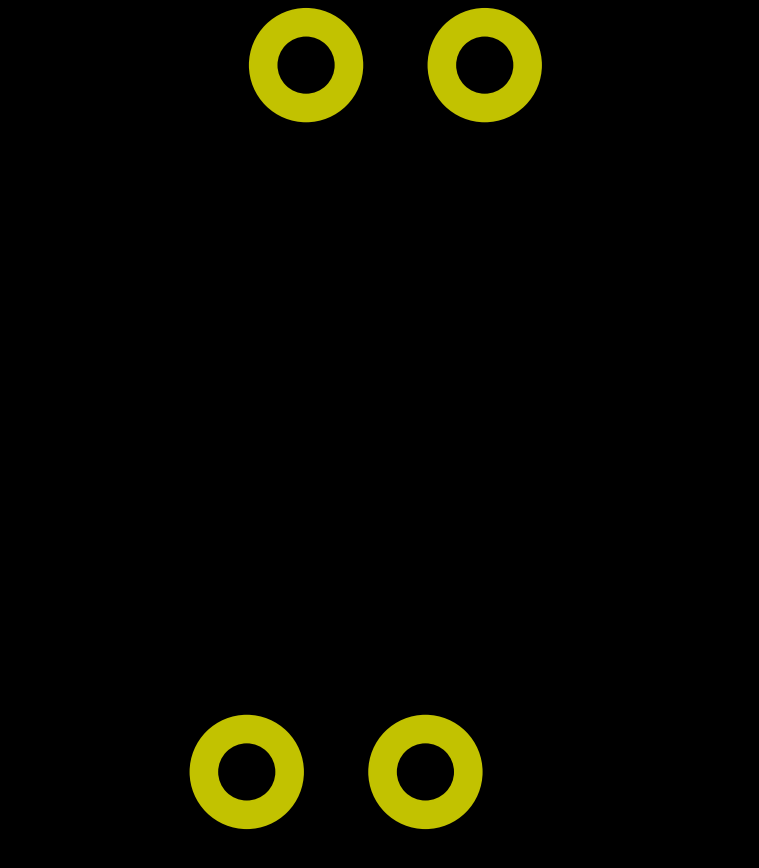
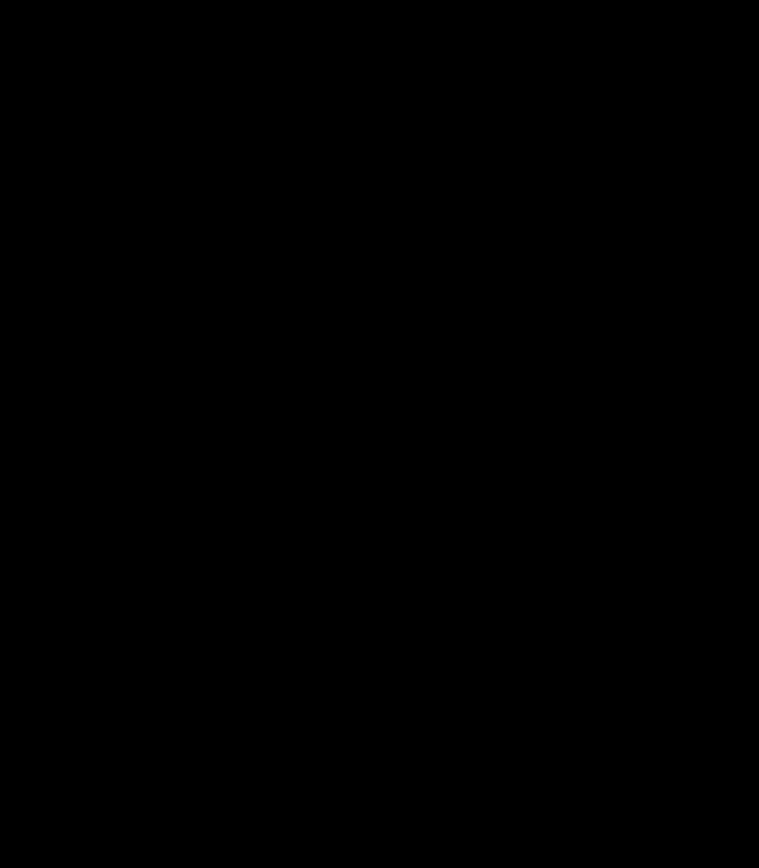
part: (395, 65) -> none
part: (336, 771) -> none

